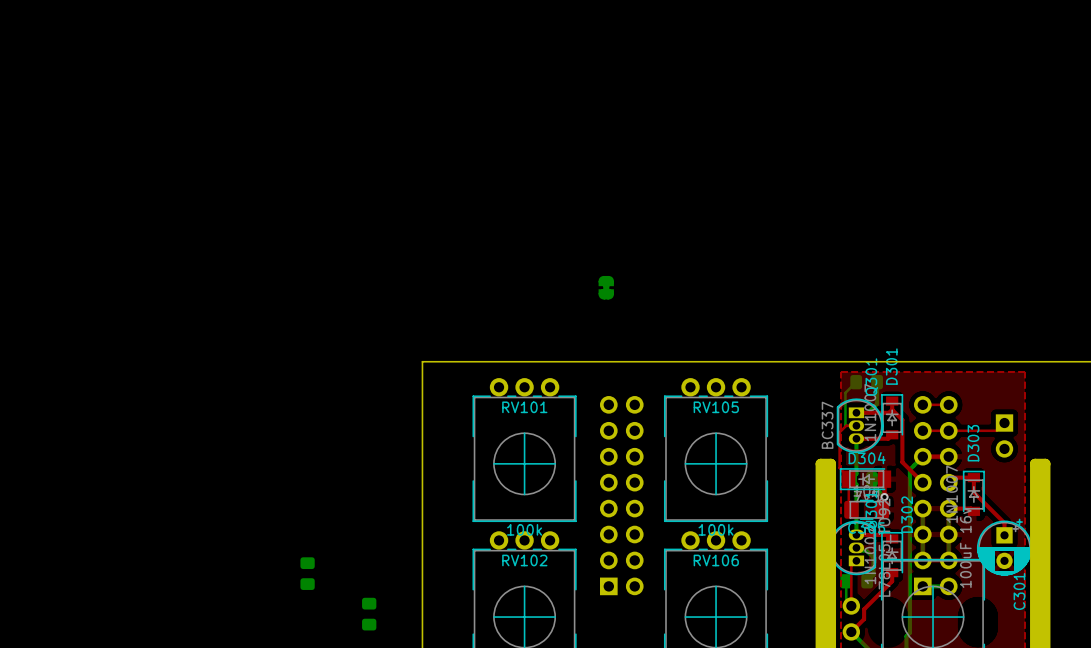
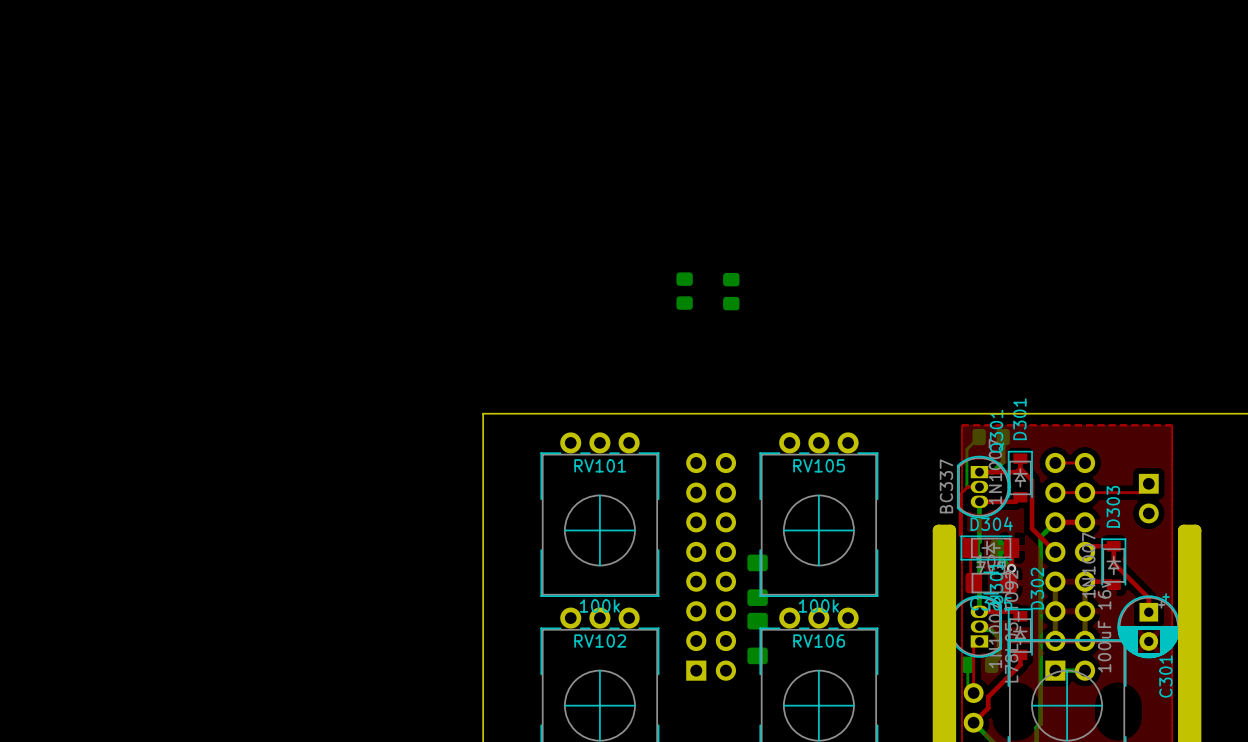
part: none -> (684, 291)
part: none -> (731, 291)
part: (606, 287) -> none
part: none -> (757, 580)
part: none -> (757, 638)
part: (307, 573) -> none
part: (369, 614) -> none

